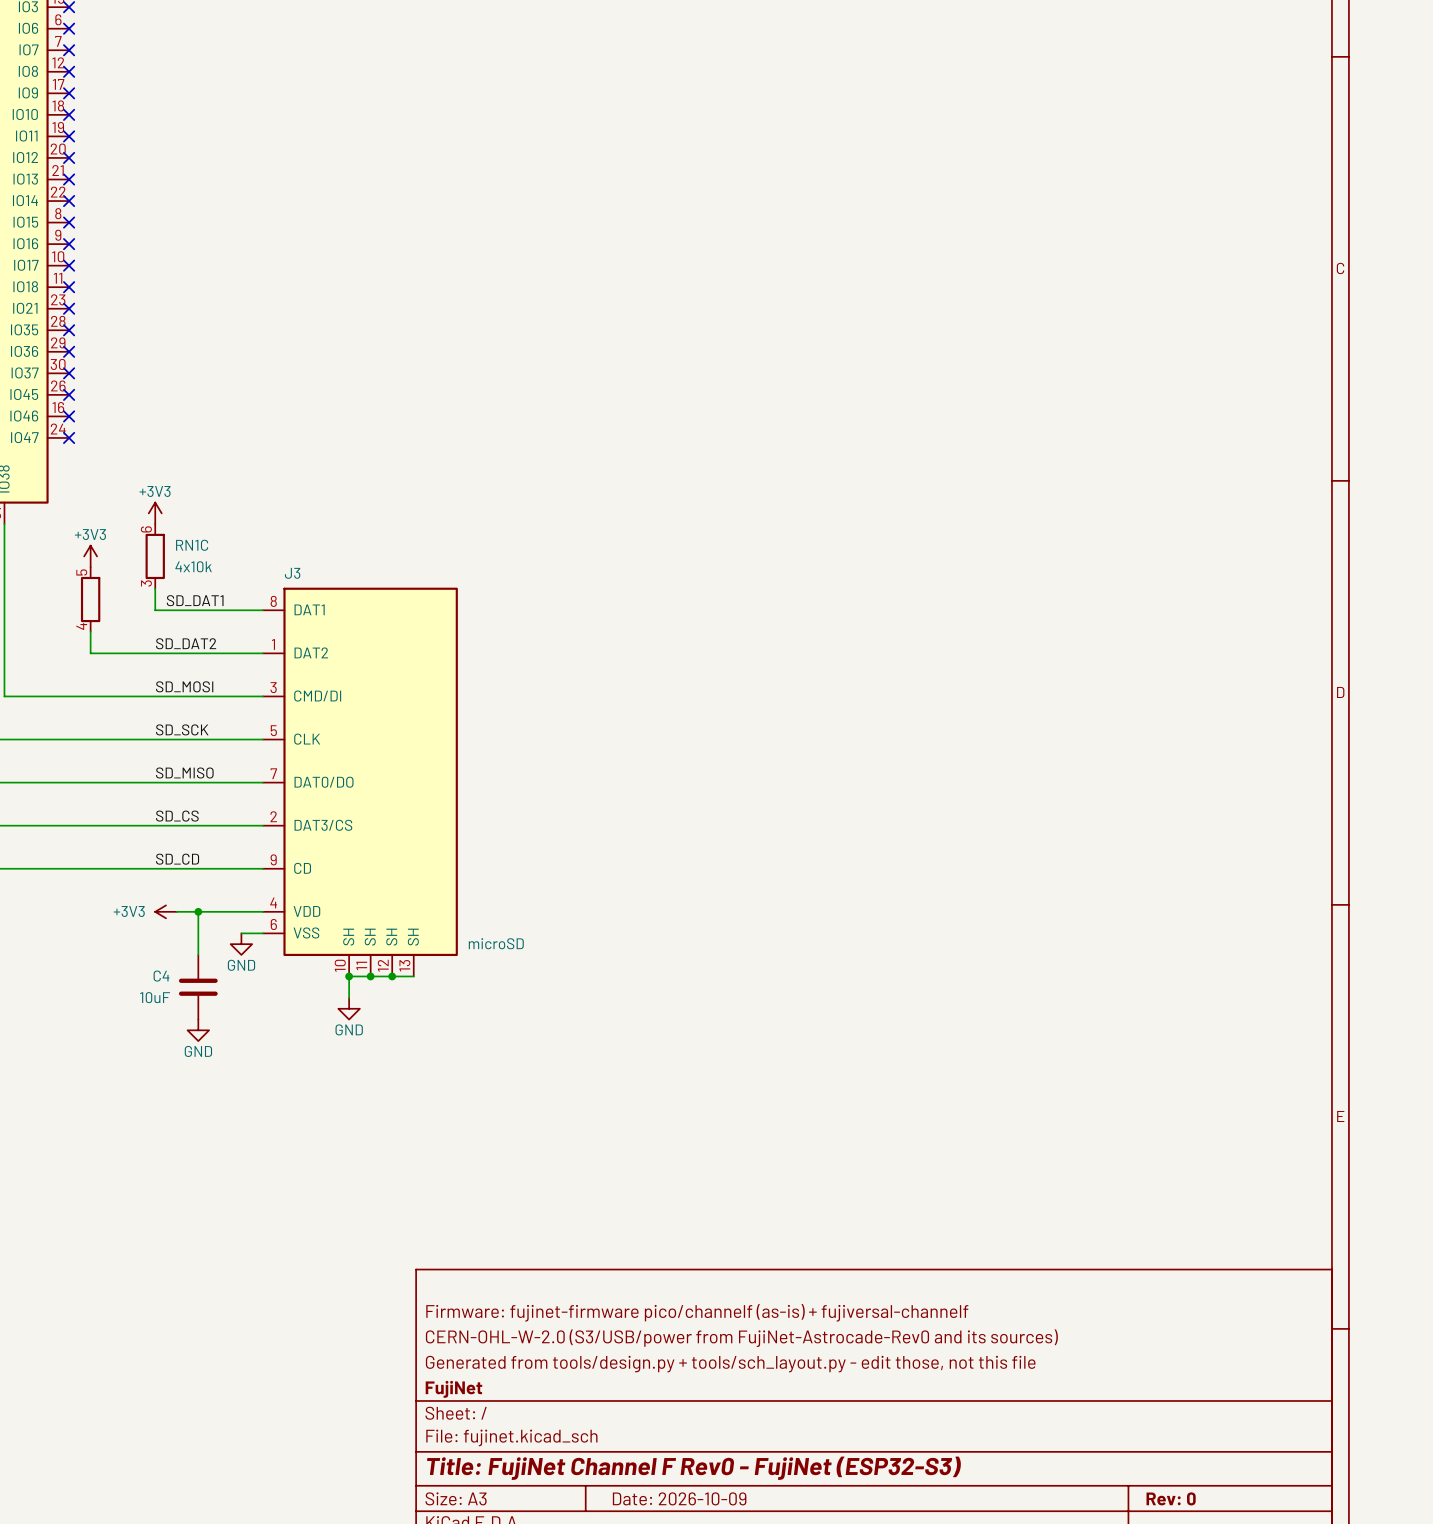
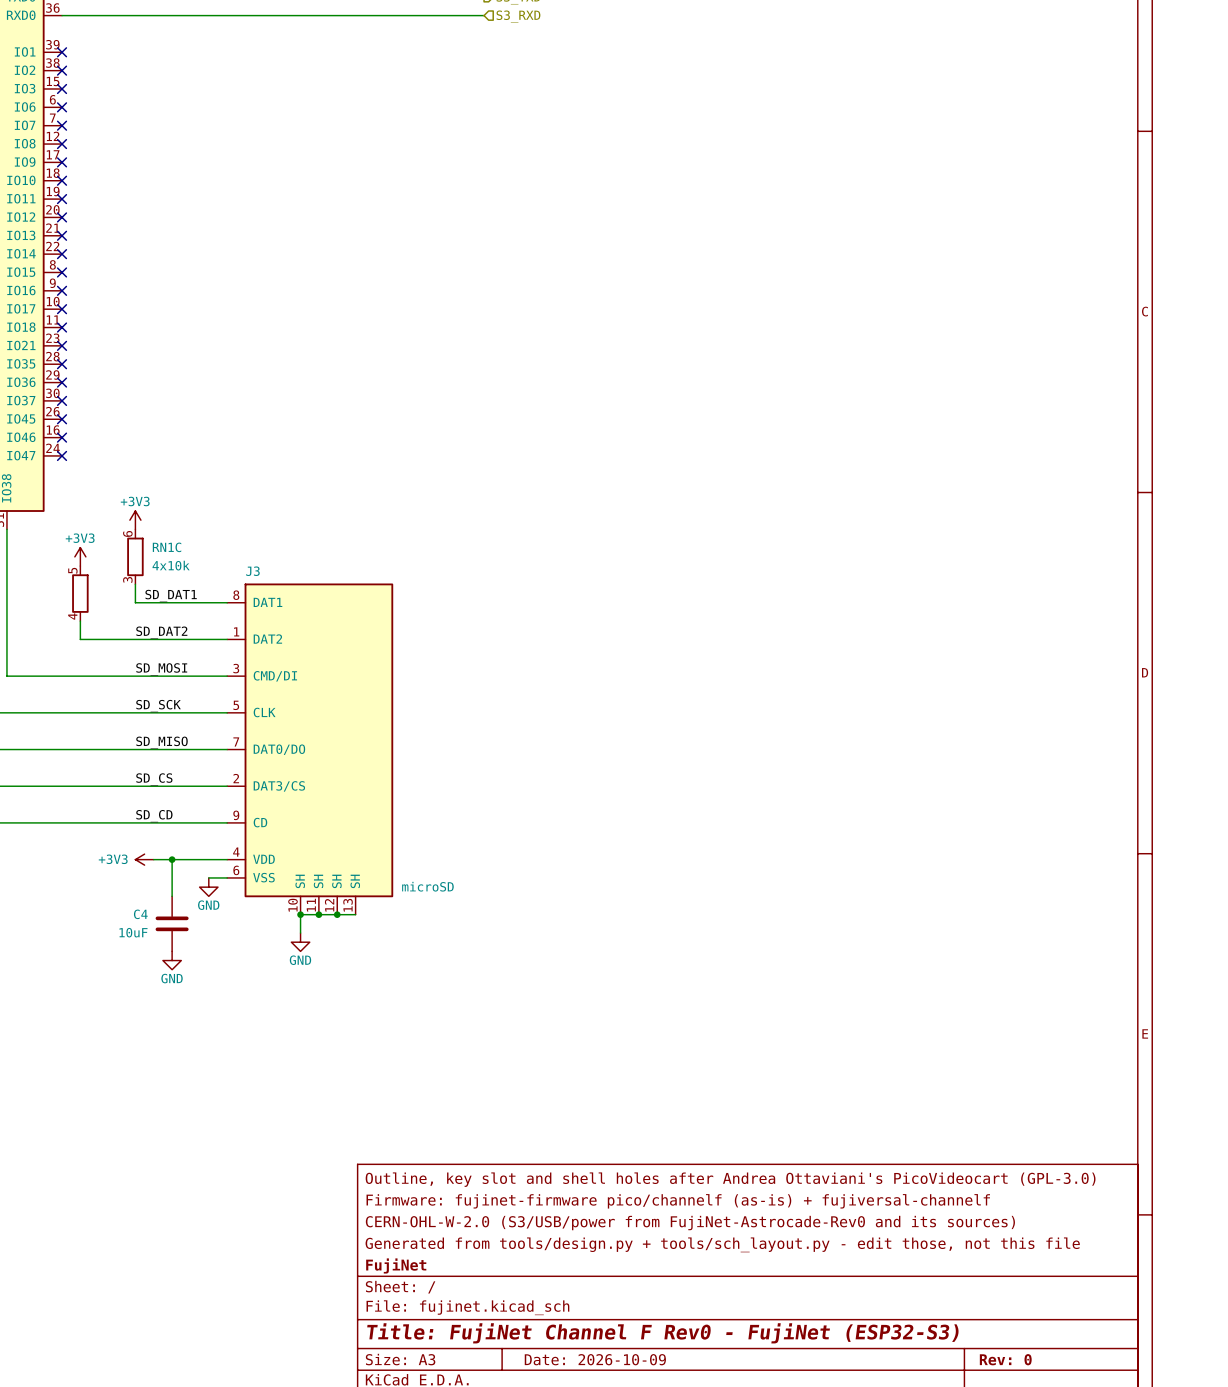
title block: none -> Outline, key slot and shell holes after Andrea Ottaviani's PicoVideocart (GPL-3.0) (730, 1179)

